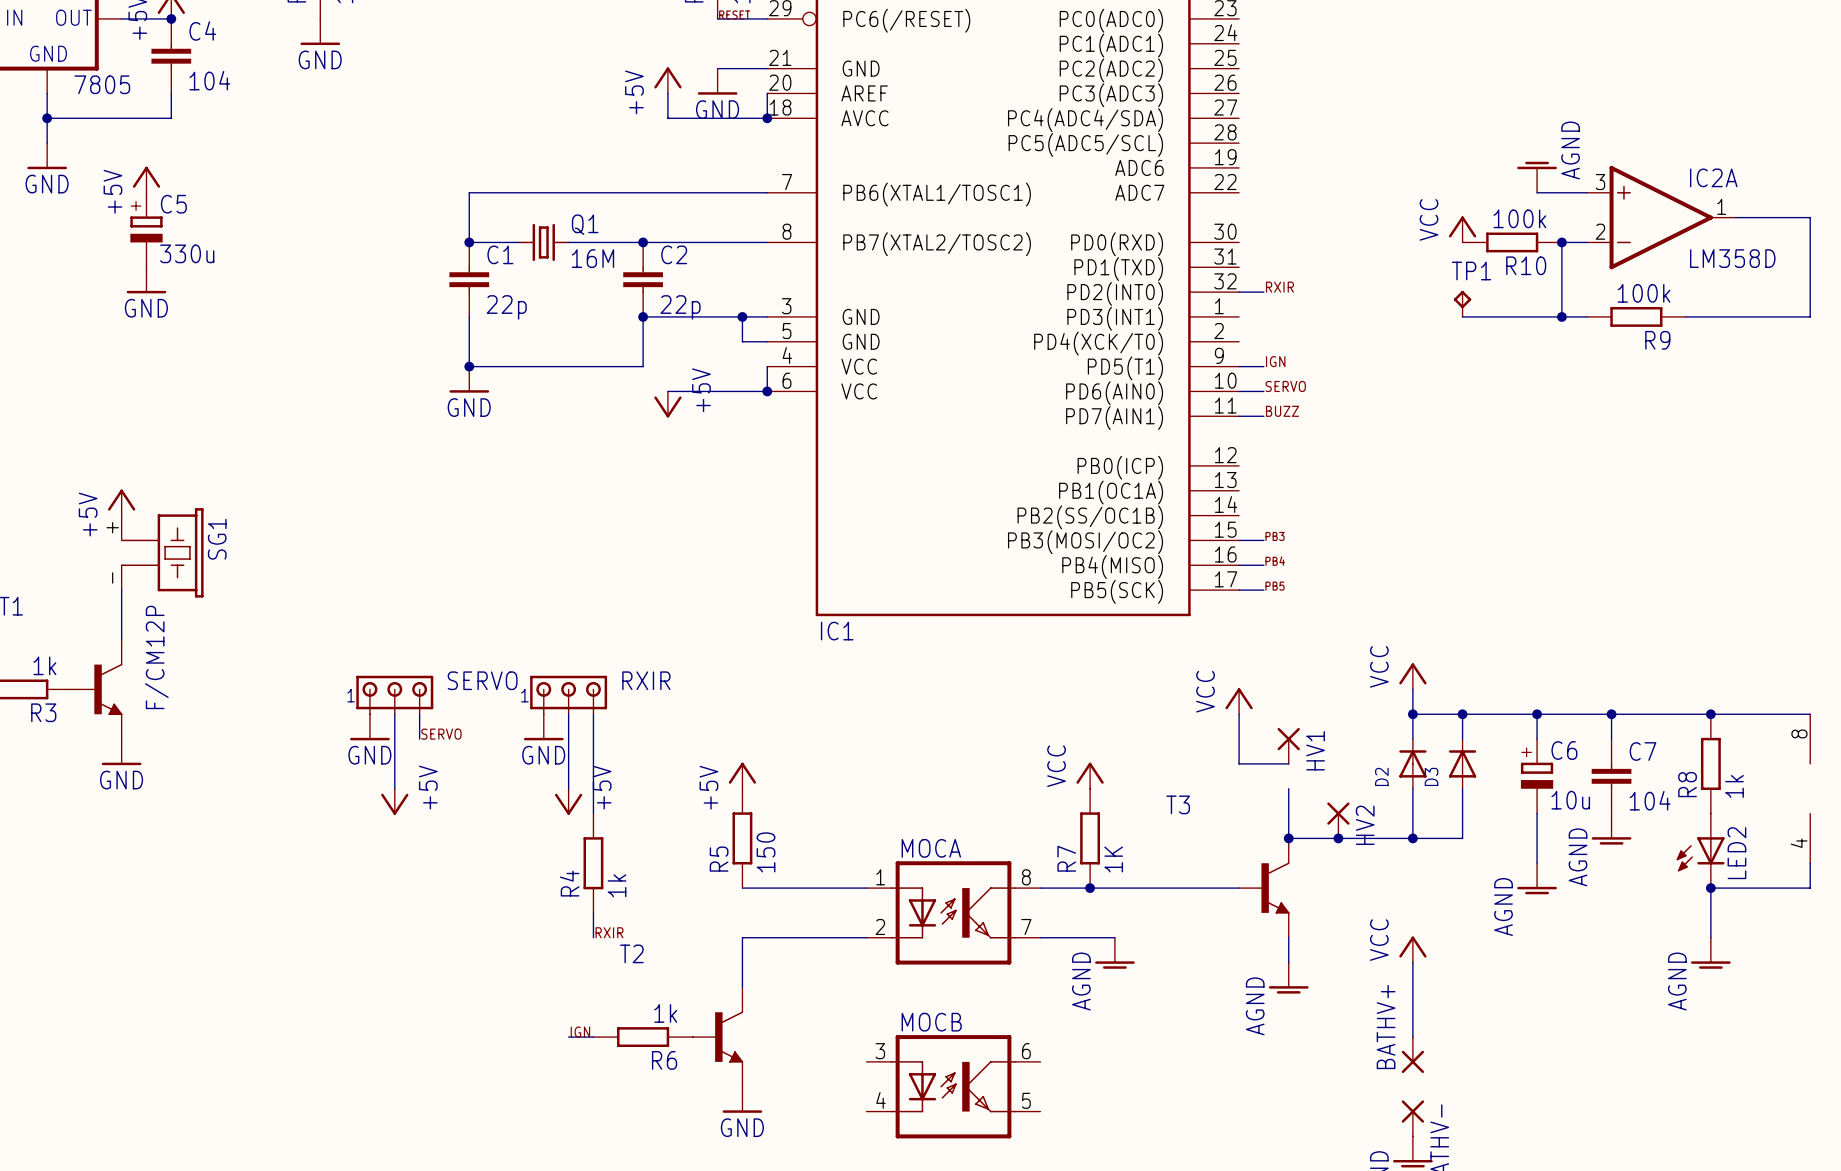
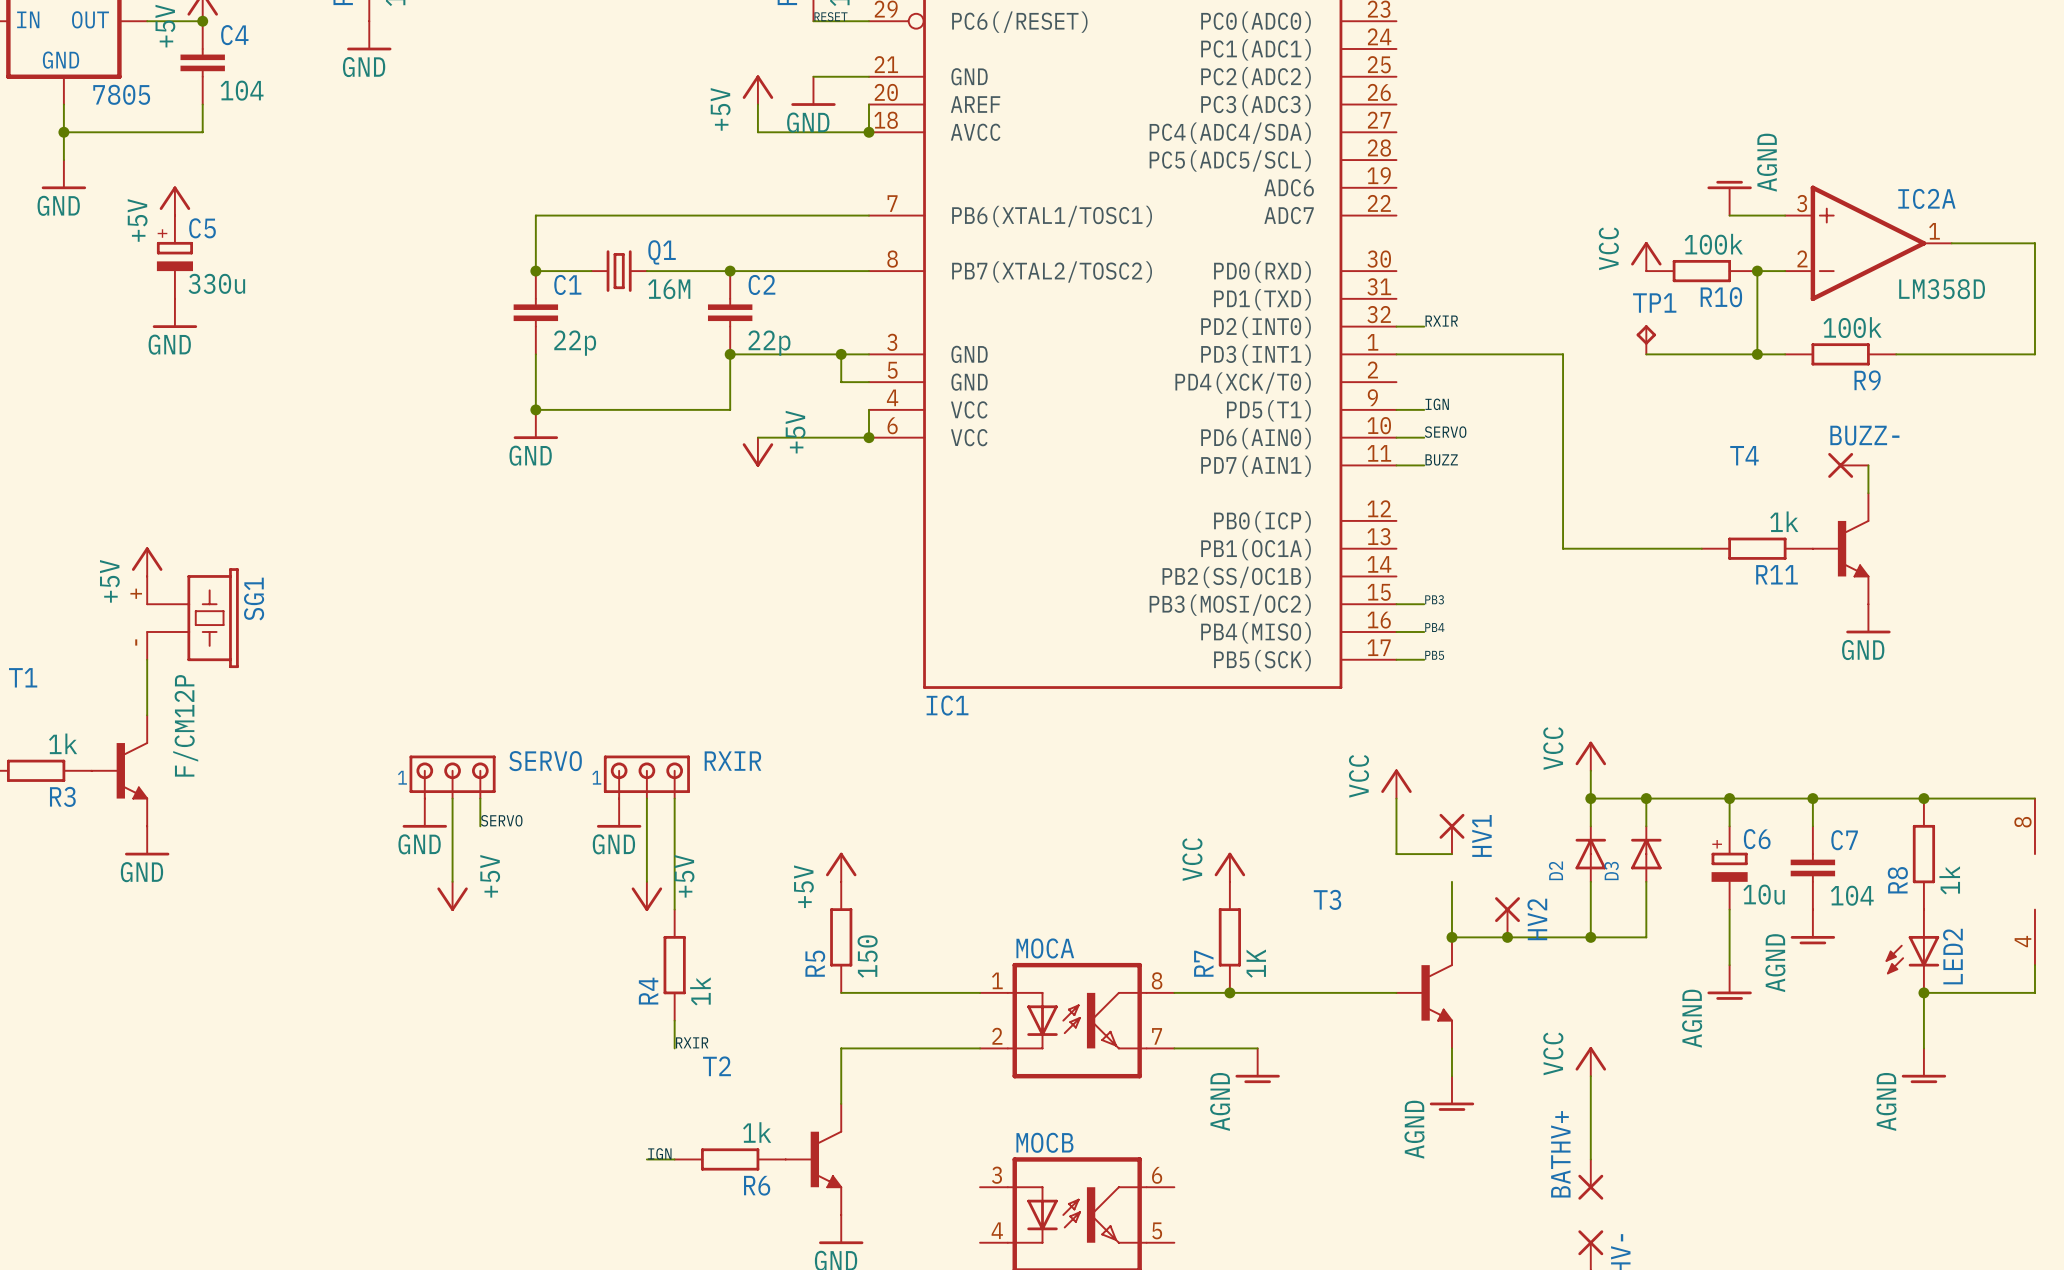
wire: none -> (1396, 354) (1563, 354) (1563, 548) (1701, 548)
BUZZ-: none -> (1848, 465)
wire: none -> (1868, 465) (1868, 493)
R11: none -> 1k (1757, 548)
T4: none -> (1841, 548)
power symbol: none -> GND (1868, 618)

